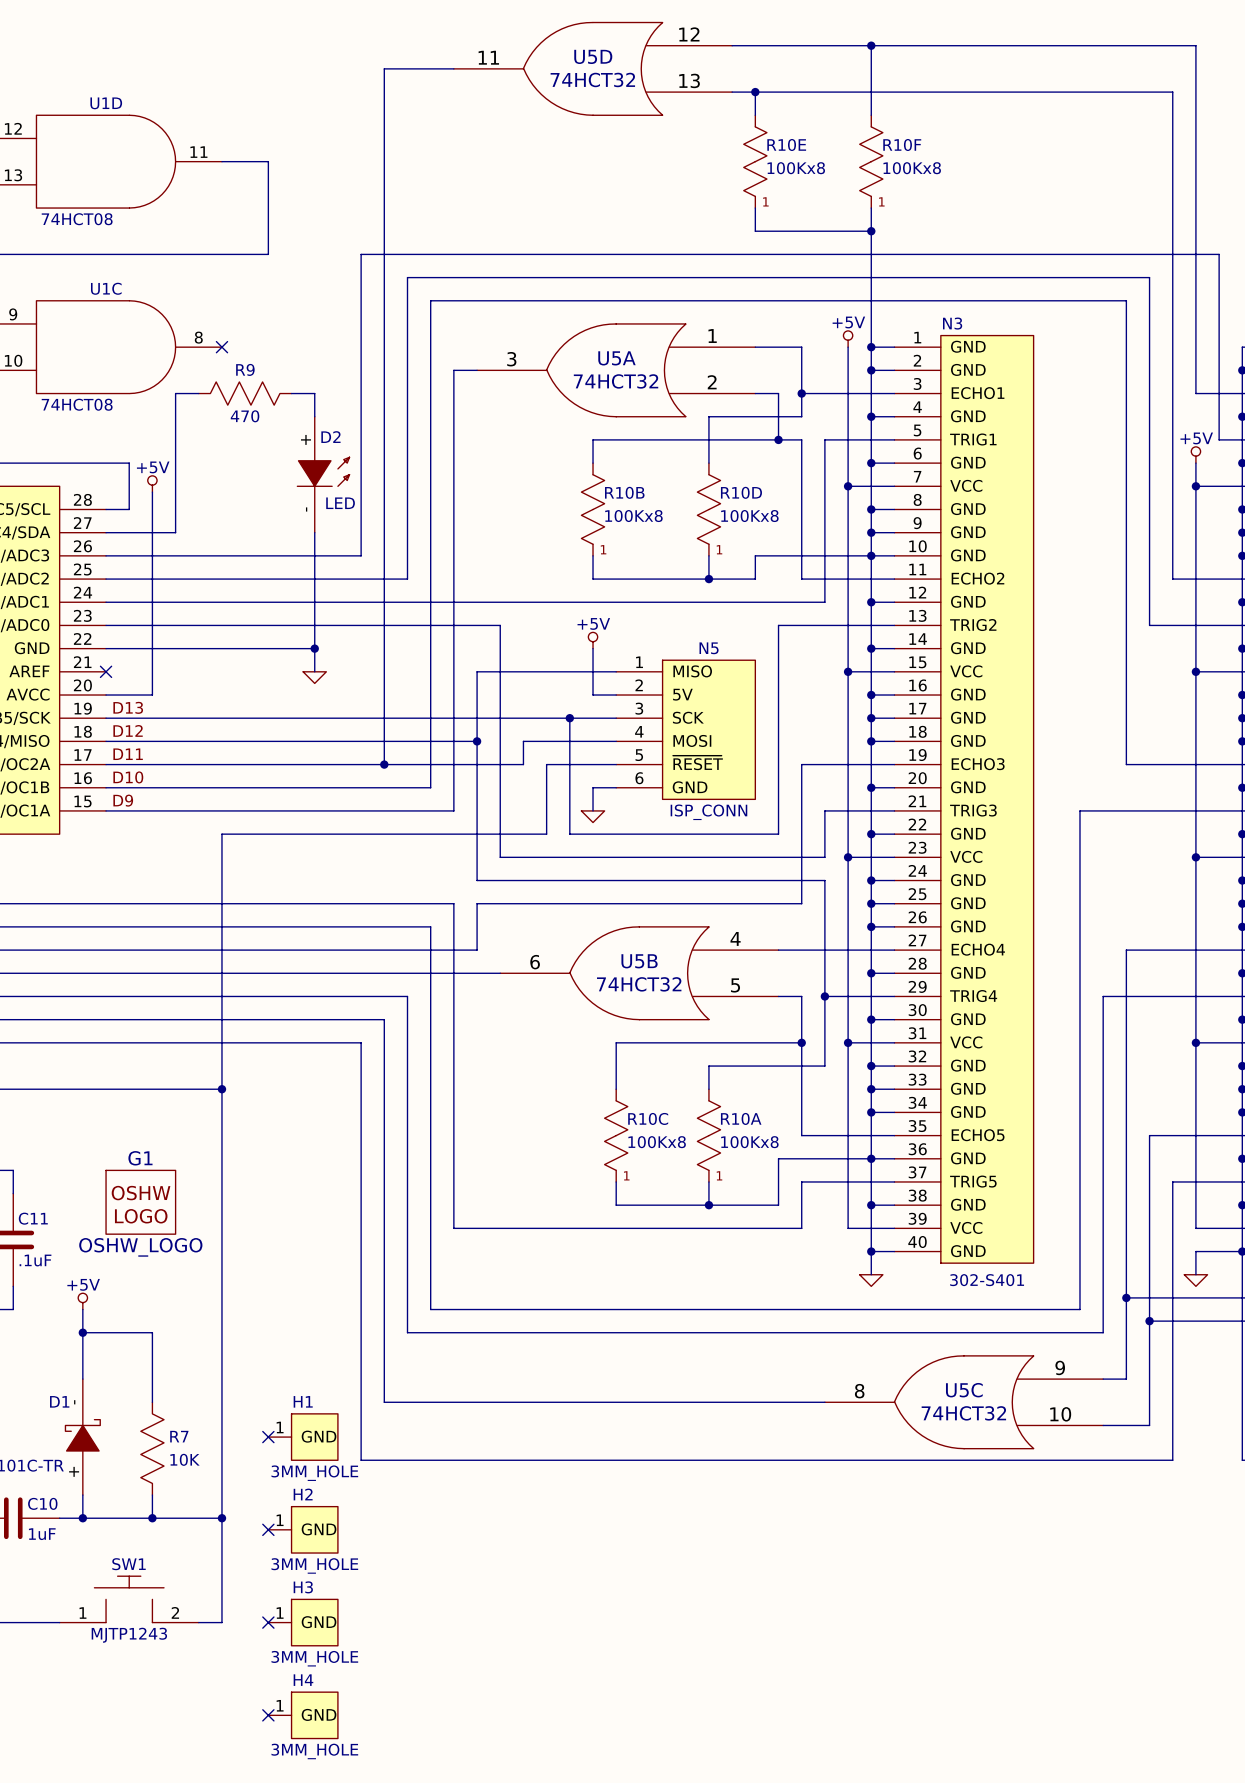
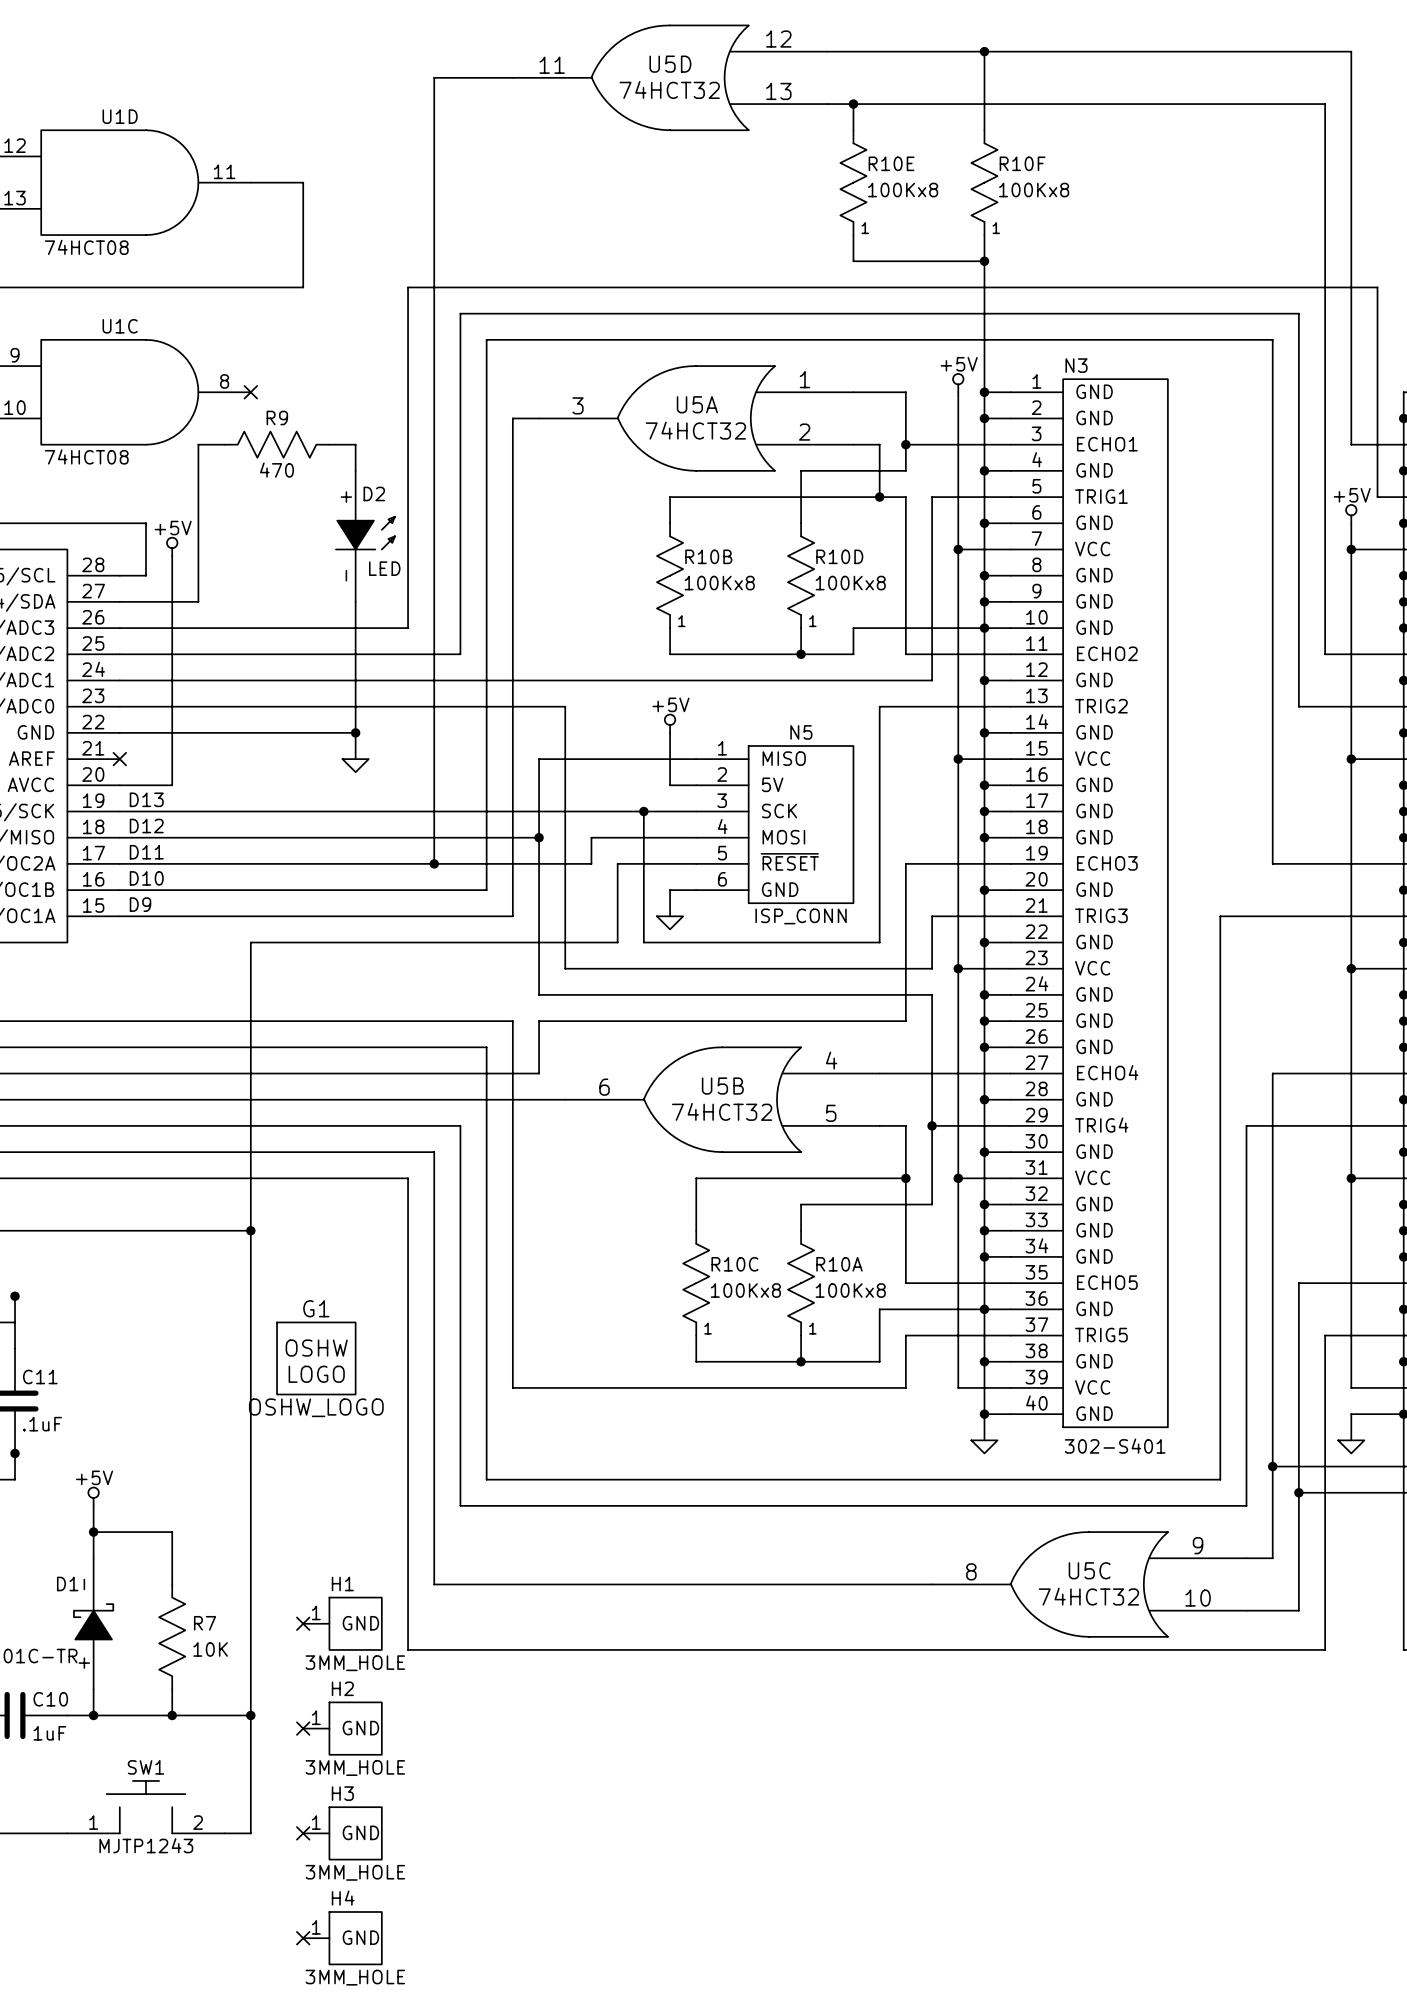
wire: none -> (15, 1296) (15, 1322)
junction: none -> (15, 1296)
G1 position: (140, 1202) -> (316, 1358)
junction: none -> (15, 1453)
power symbol position: +5V (82, 1301) -> +5V (93, 1496)
wire: (82, 1309) (82, 1332) (152, 1332) (152, 1355) -> (93, 1532) (172, 1532)
junction position: (82, 1332) -> (93, 1532)

